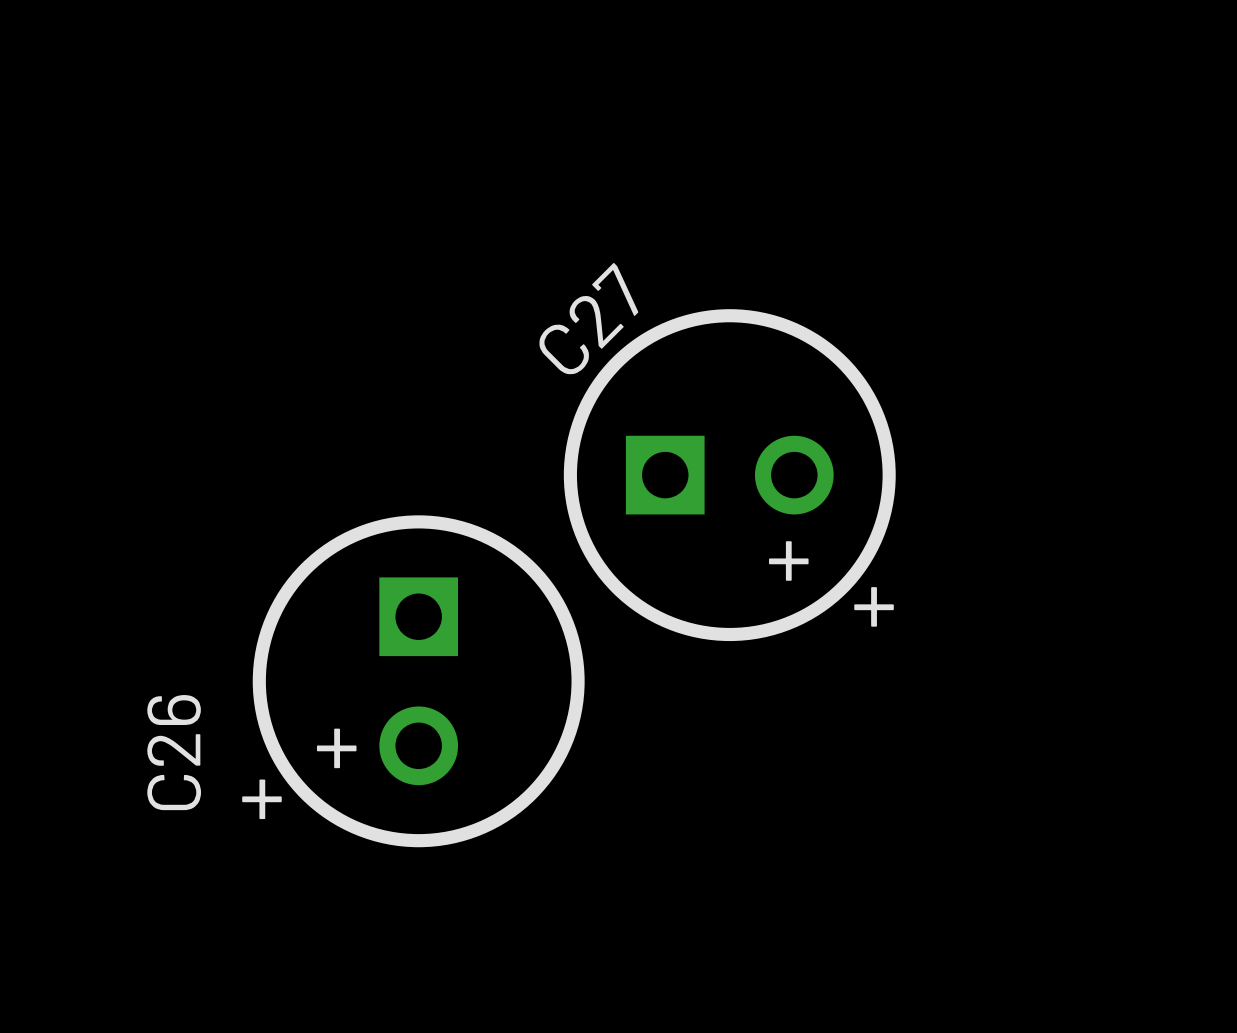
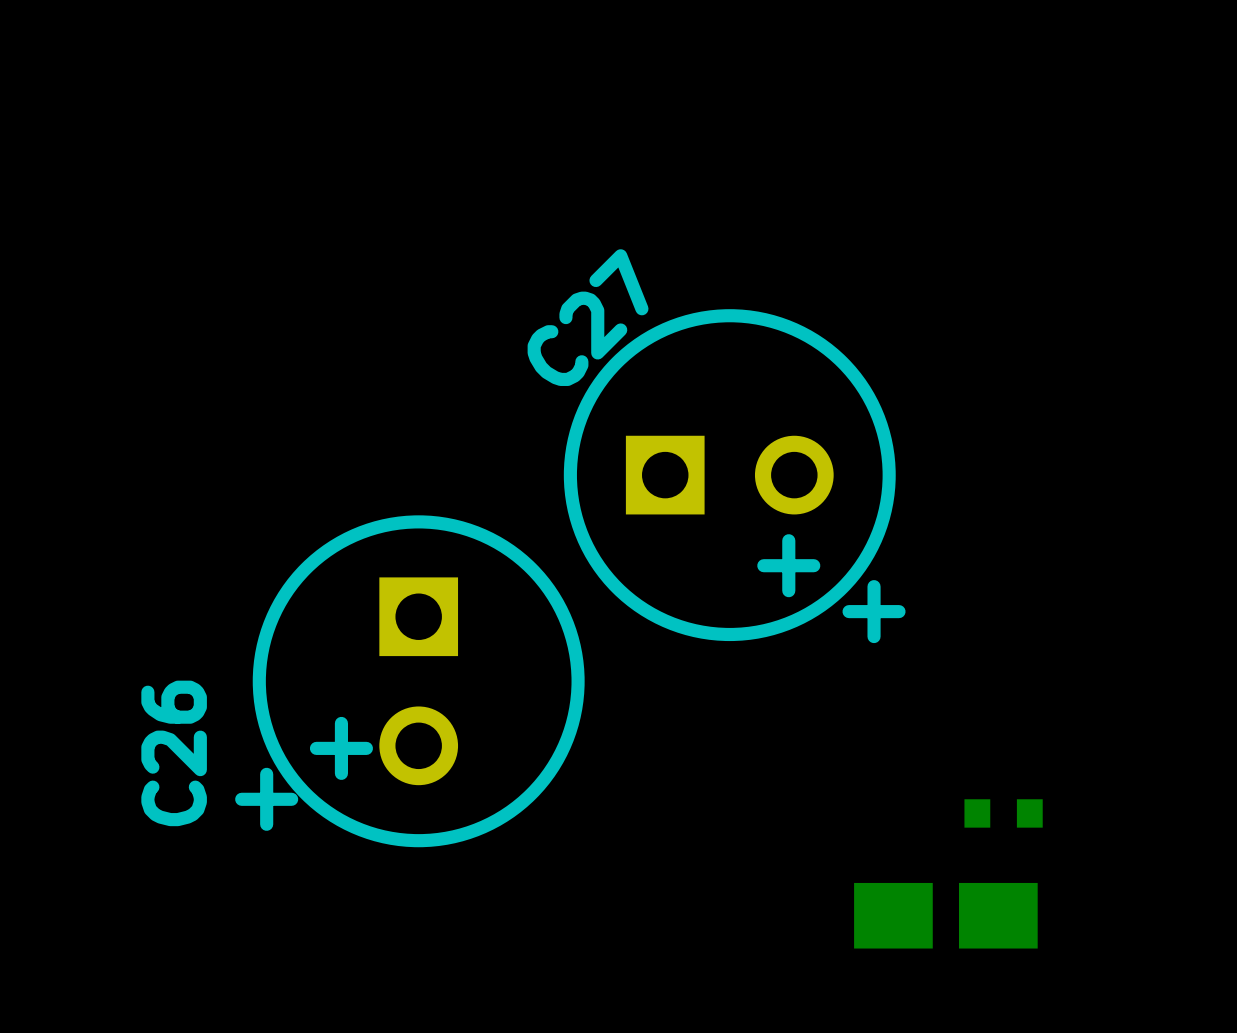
part: none -> (1003, 813)
part: none -> (945, 915)

